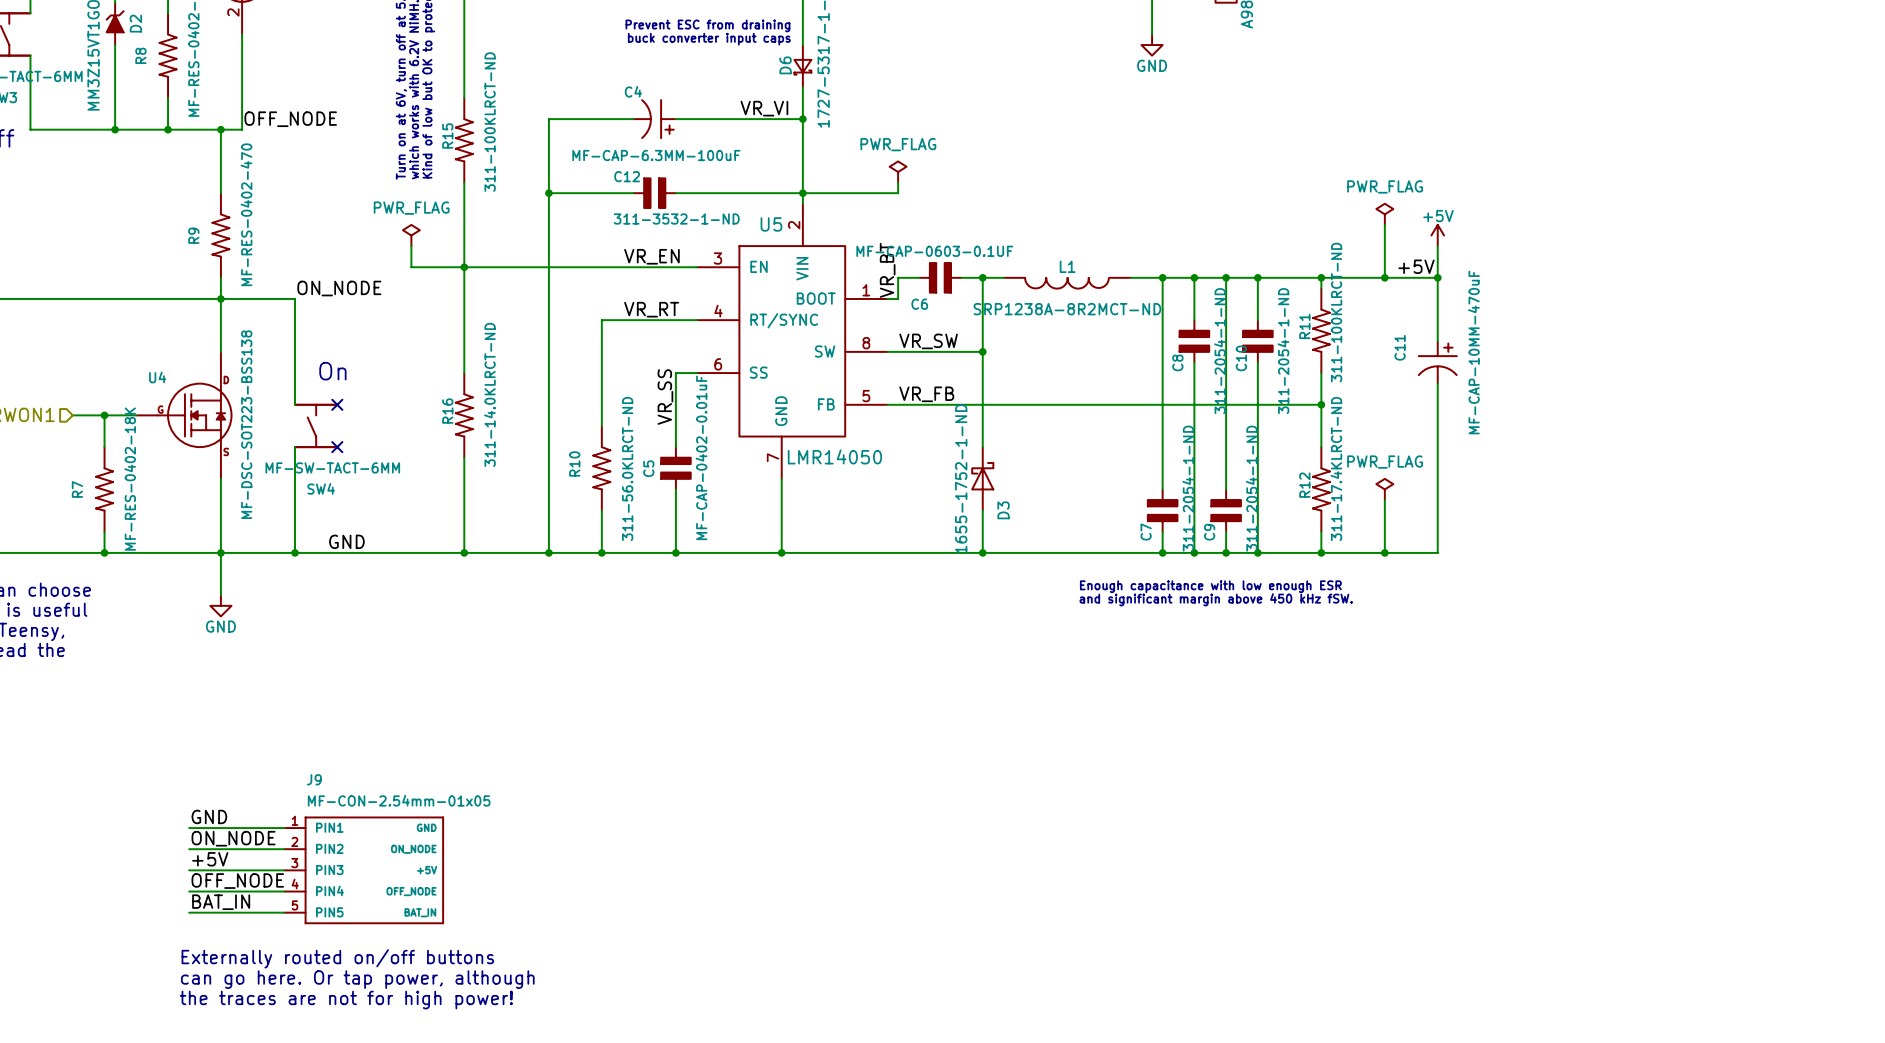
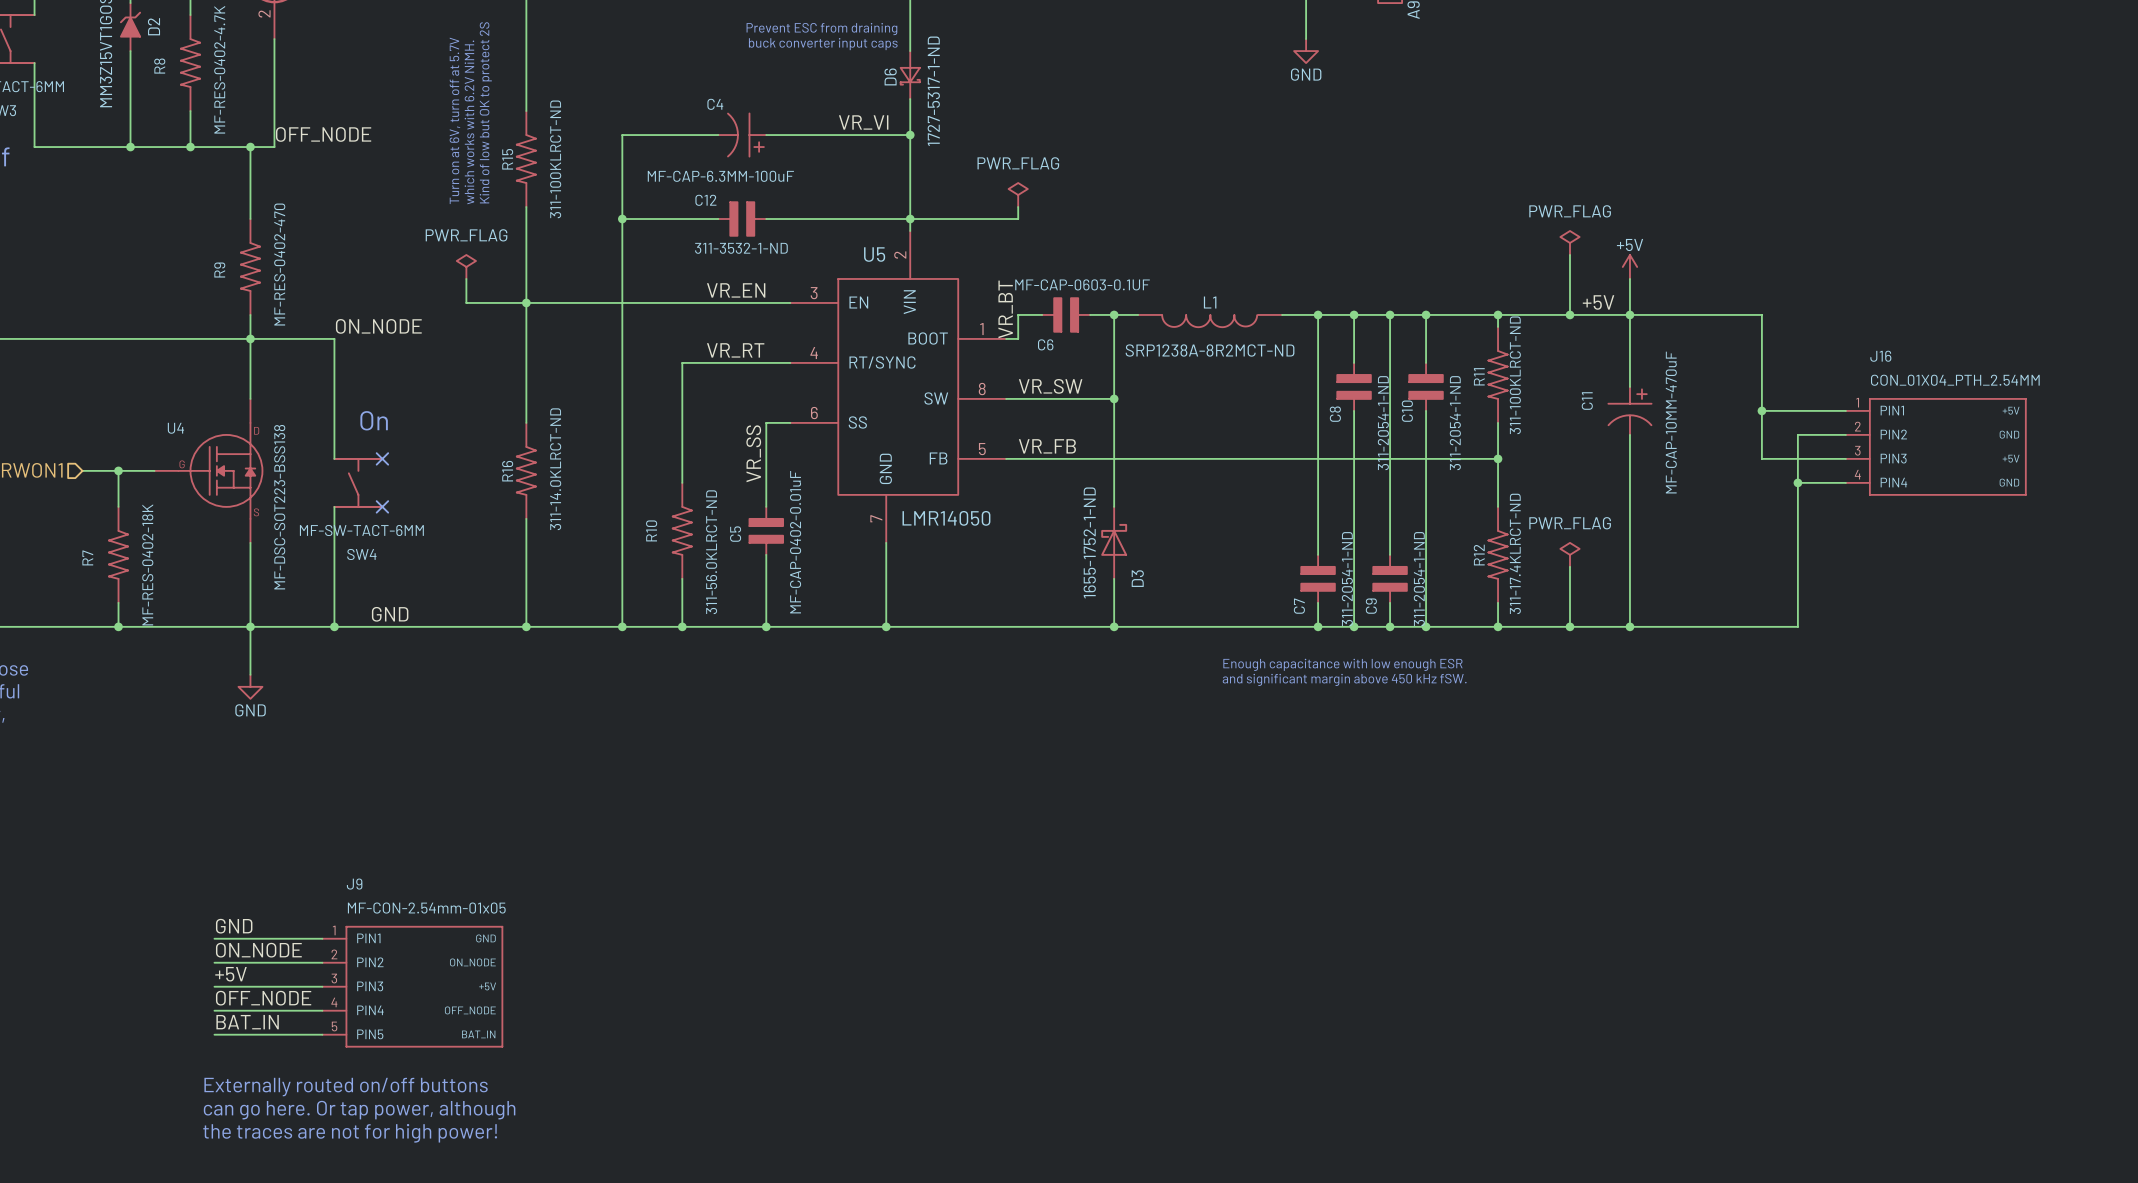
wire: none -> (1629, 314) (1761, 314) (1761, 458) (1845, 458)
wire: none -> (1761, 410) (1845, 410)
junction: none -> (1761, 410)
wire: none -> (1845, 434) (1797, 434) (1797, 626) (1629, 626)
J16: none -> CON_01X04_PTH_2.54MM (1935, 446)
wire: none -> (1797, 482) (1845, 482)
junction: none -> (1797, 482)
junction: none -> (1629, 626)

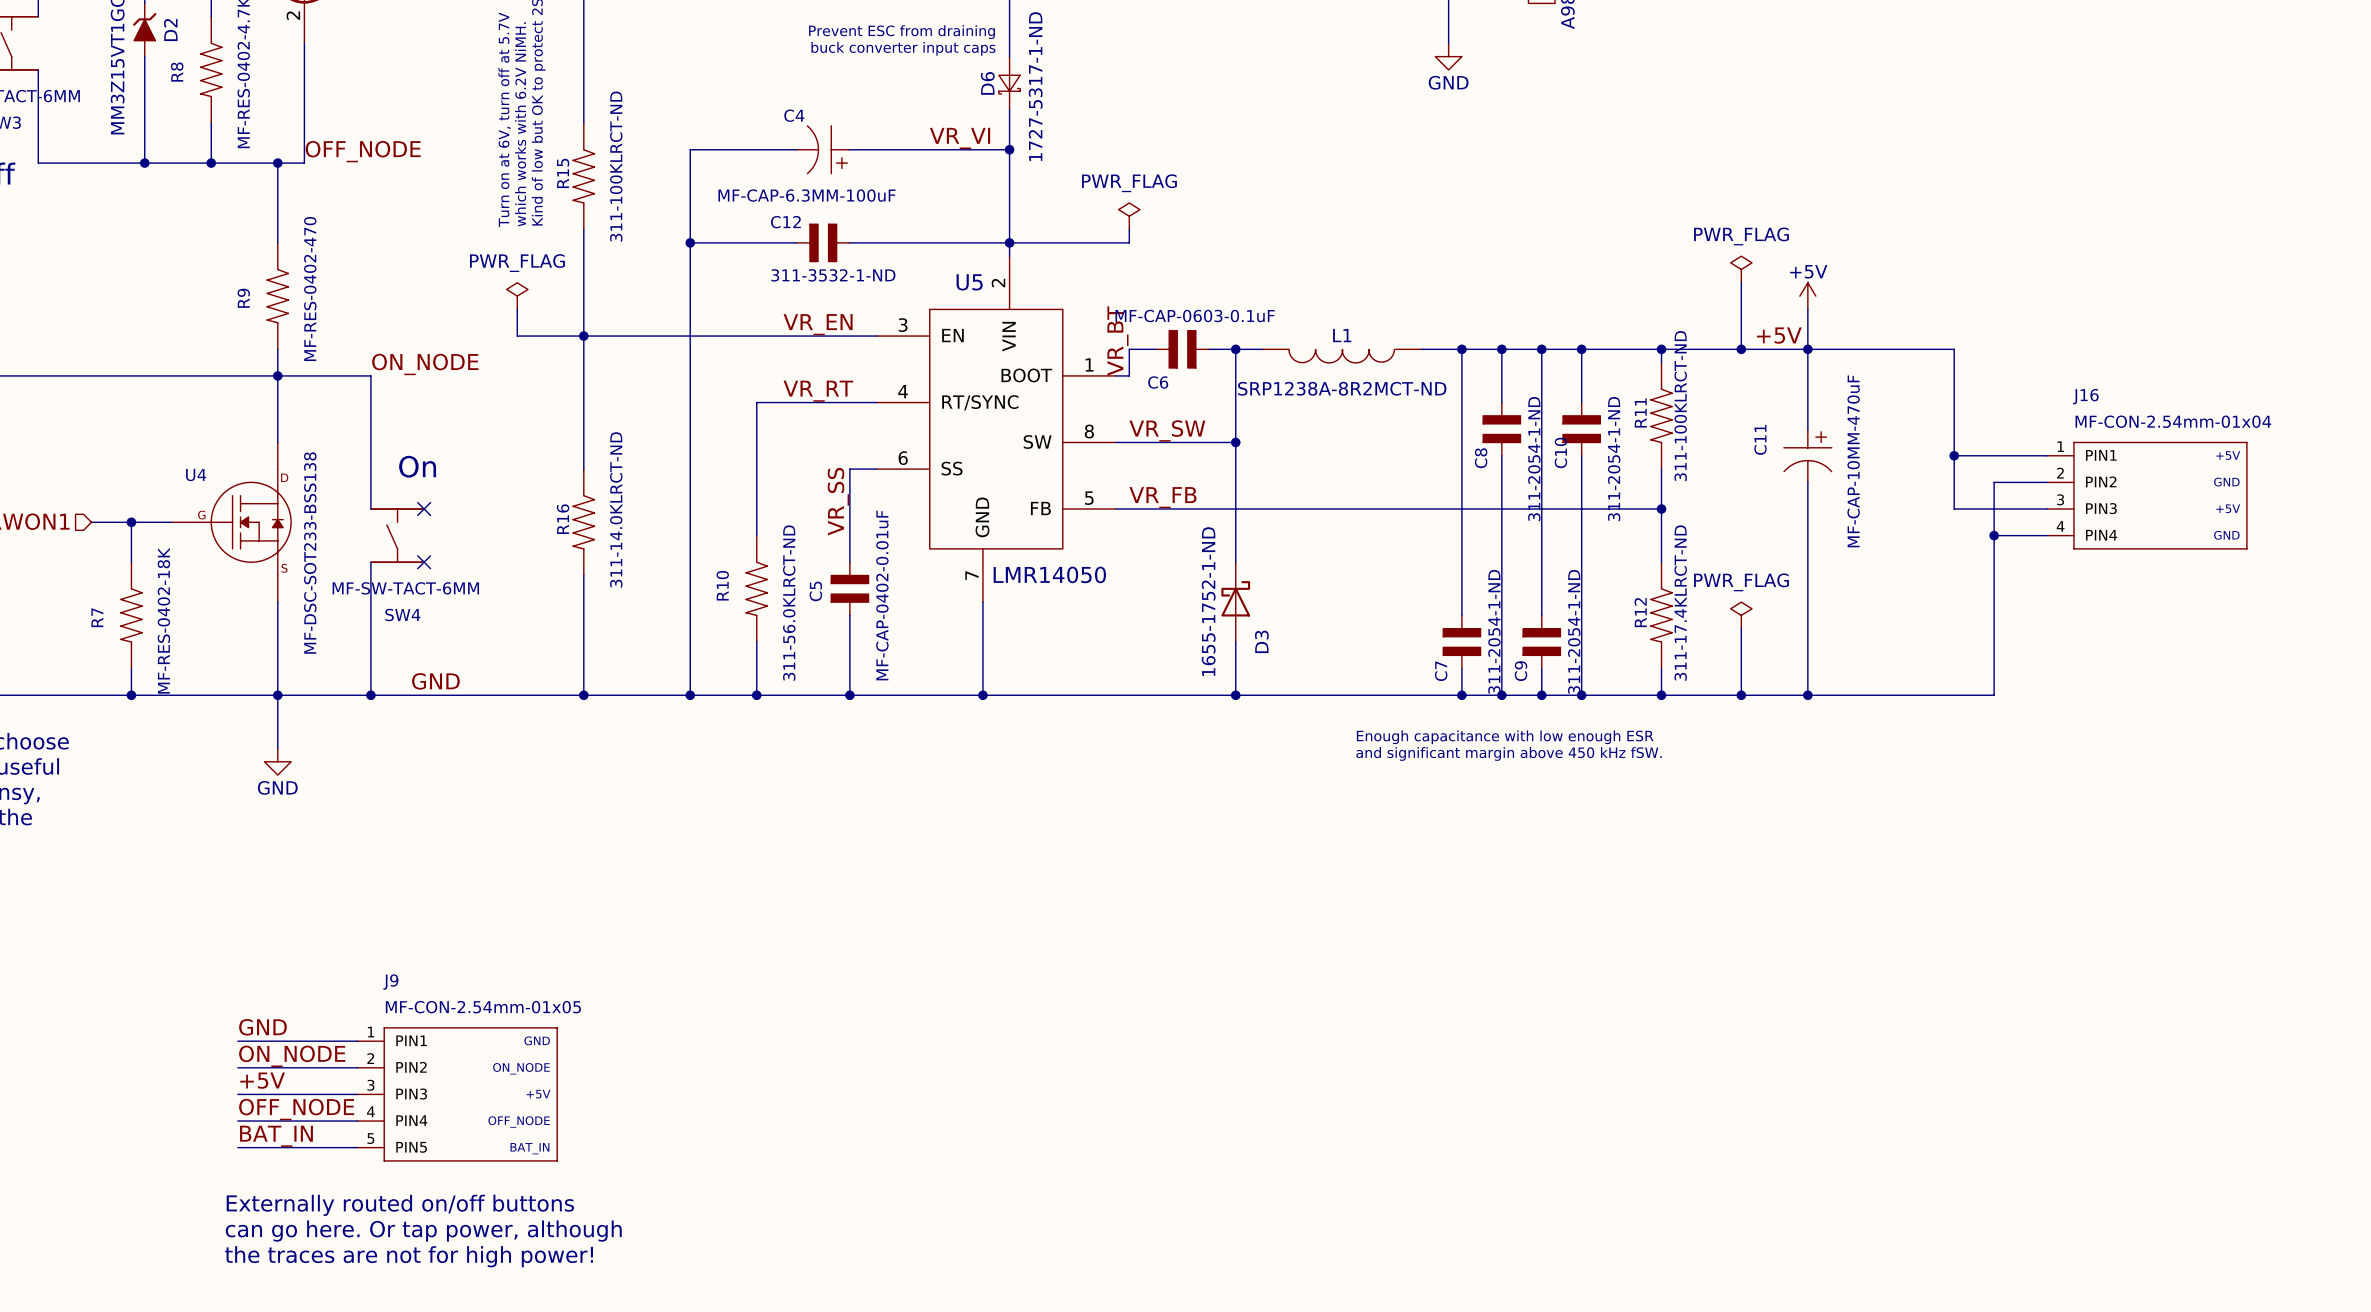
C6 value: MF-CAP-0603-0.1UF (1082, 284) -> MF-CAP-0603-0.1uF (1195, 315)
J16 value: CON_01X04_PTH_2.54MM (1955, 380) -> MF-CON-2.54mm-01x04 (2173, 421)
U4 value: MF-DSC-SOT223-BSS138 (279, 507) -> MF-DSC-SOT233-BSS138 (310, 553)

